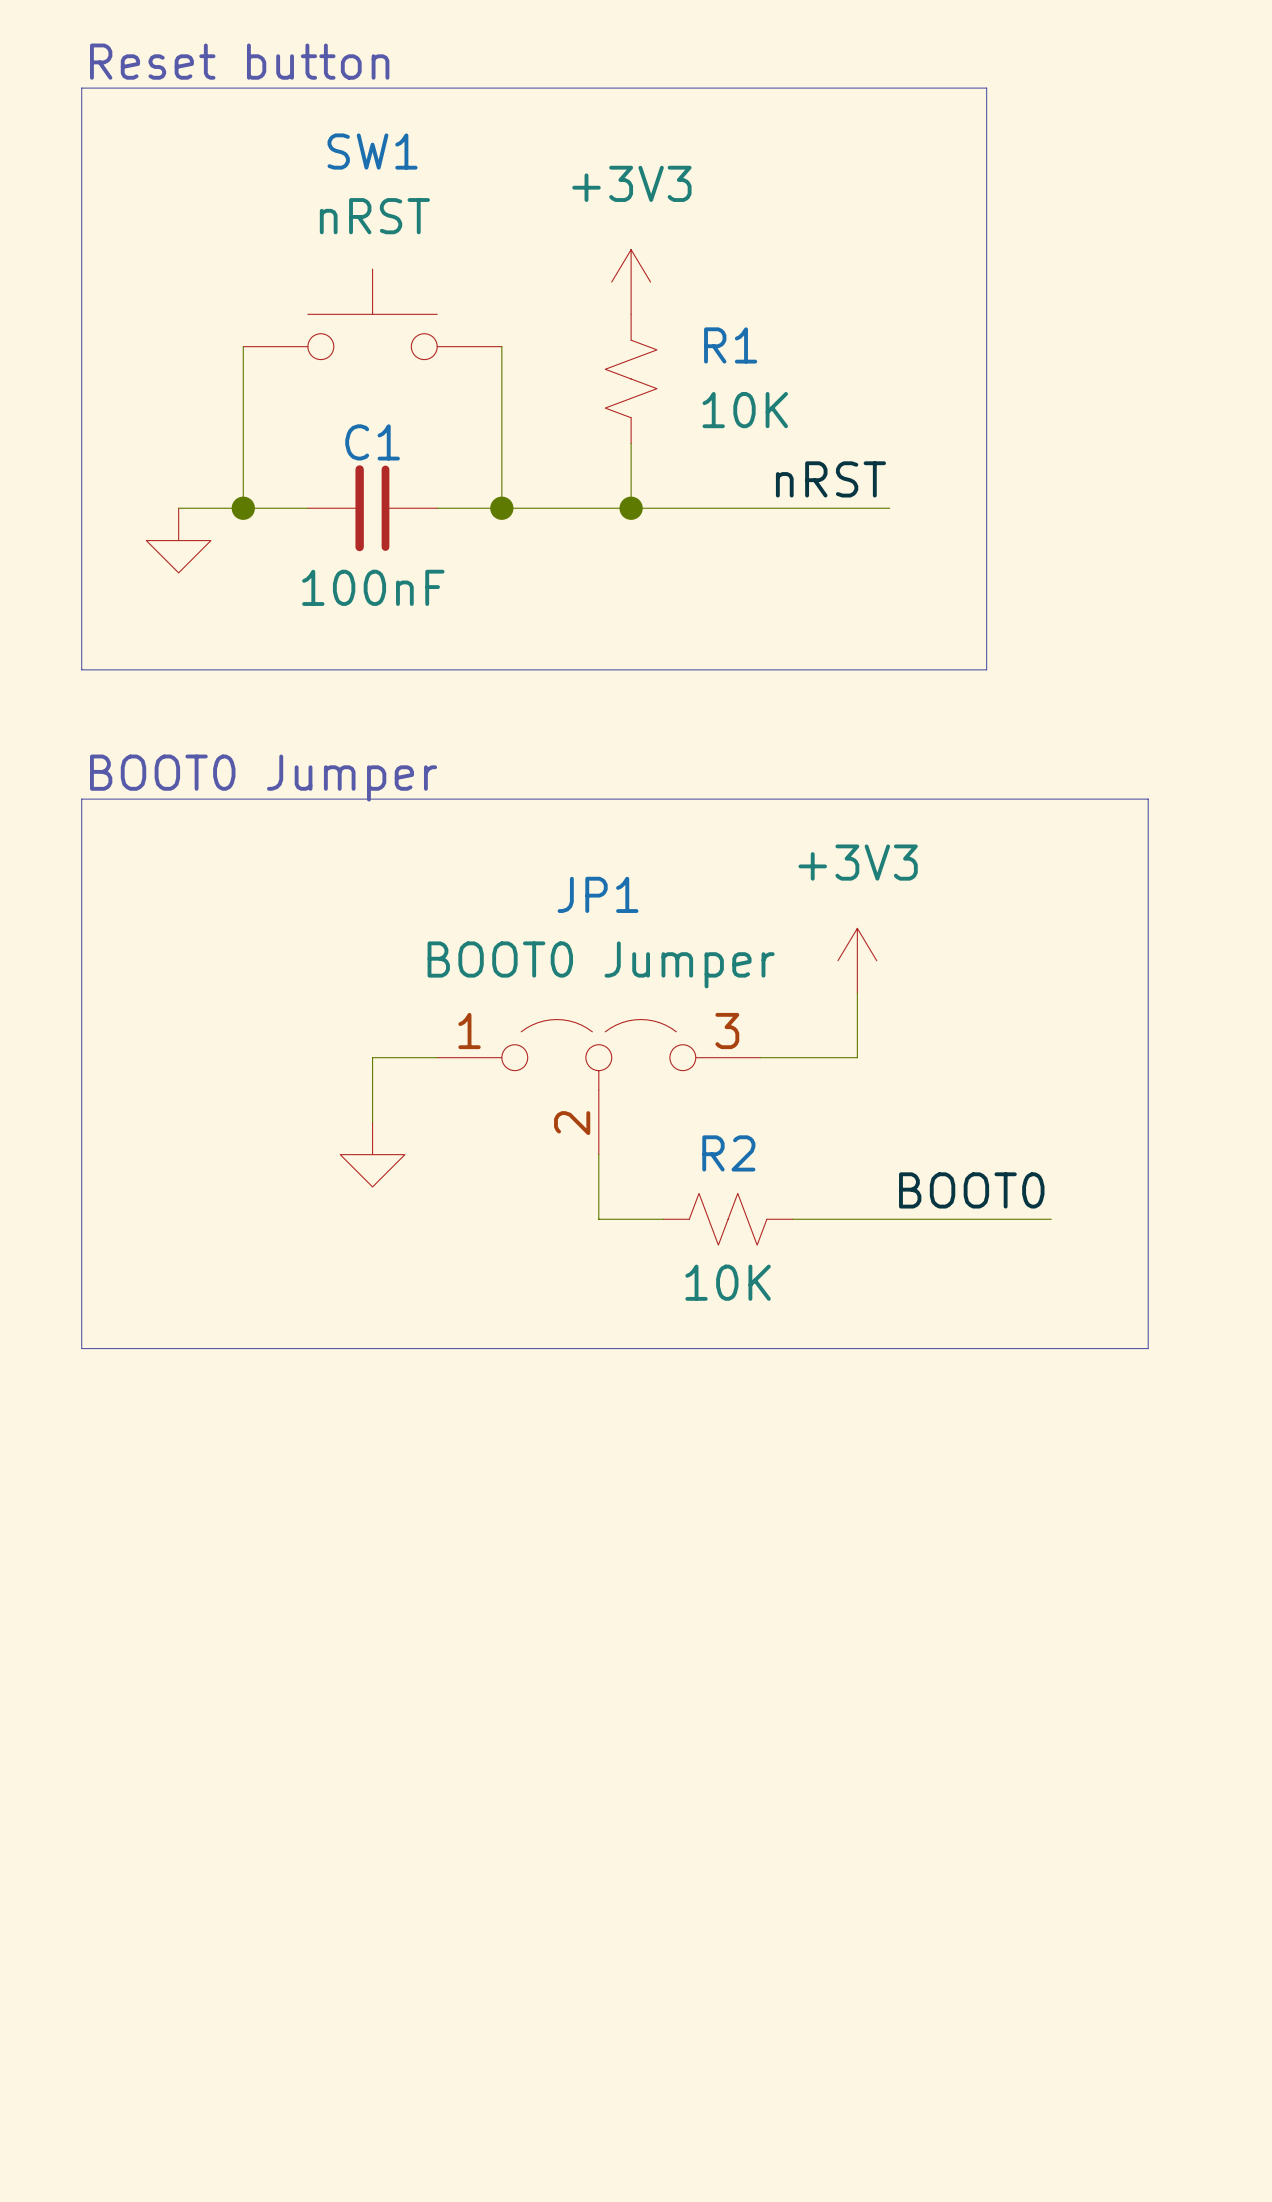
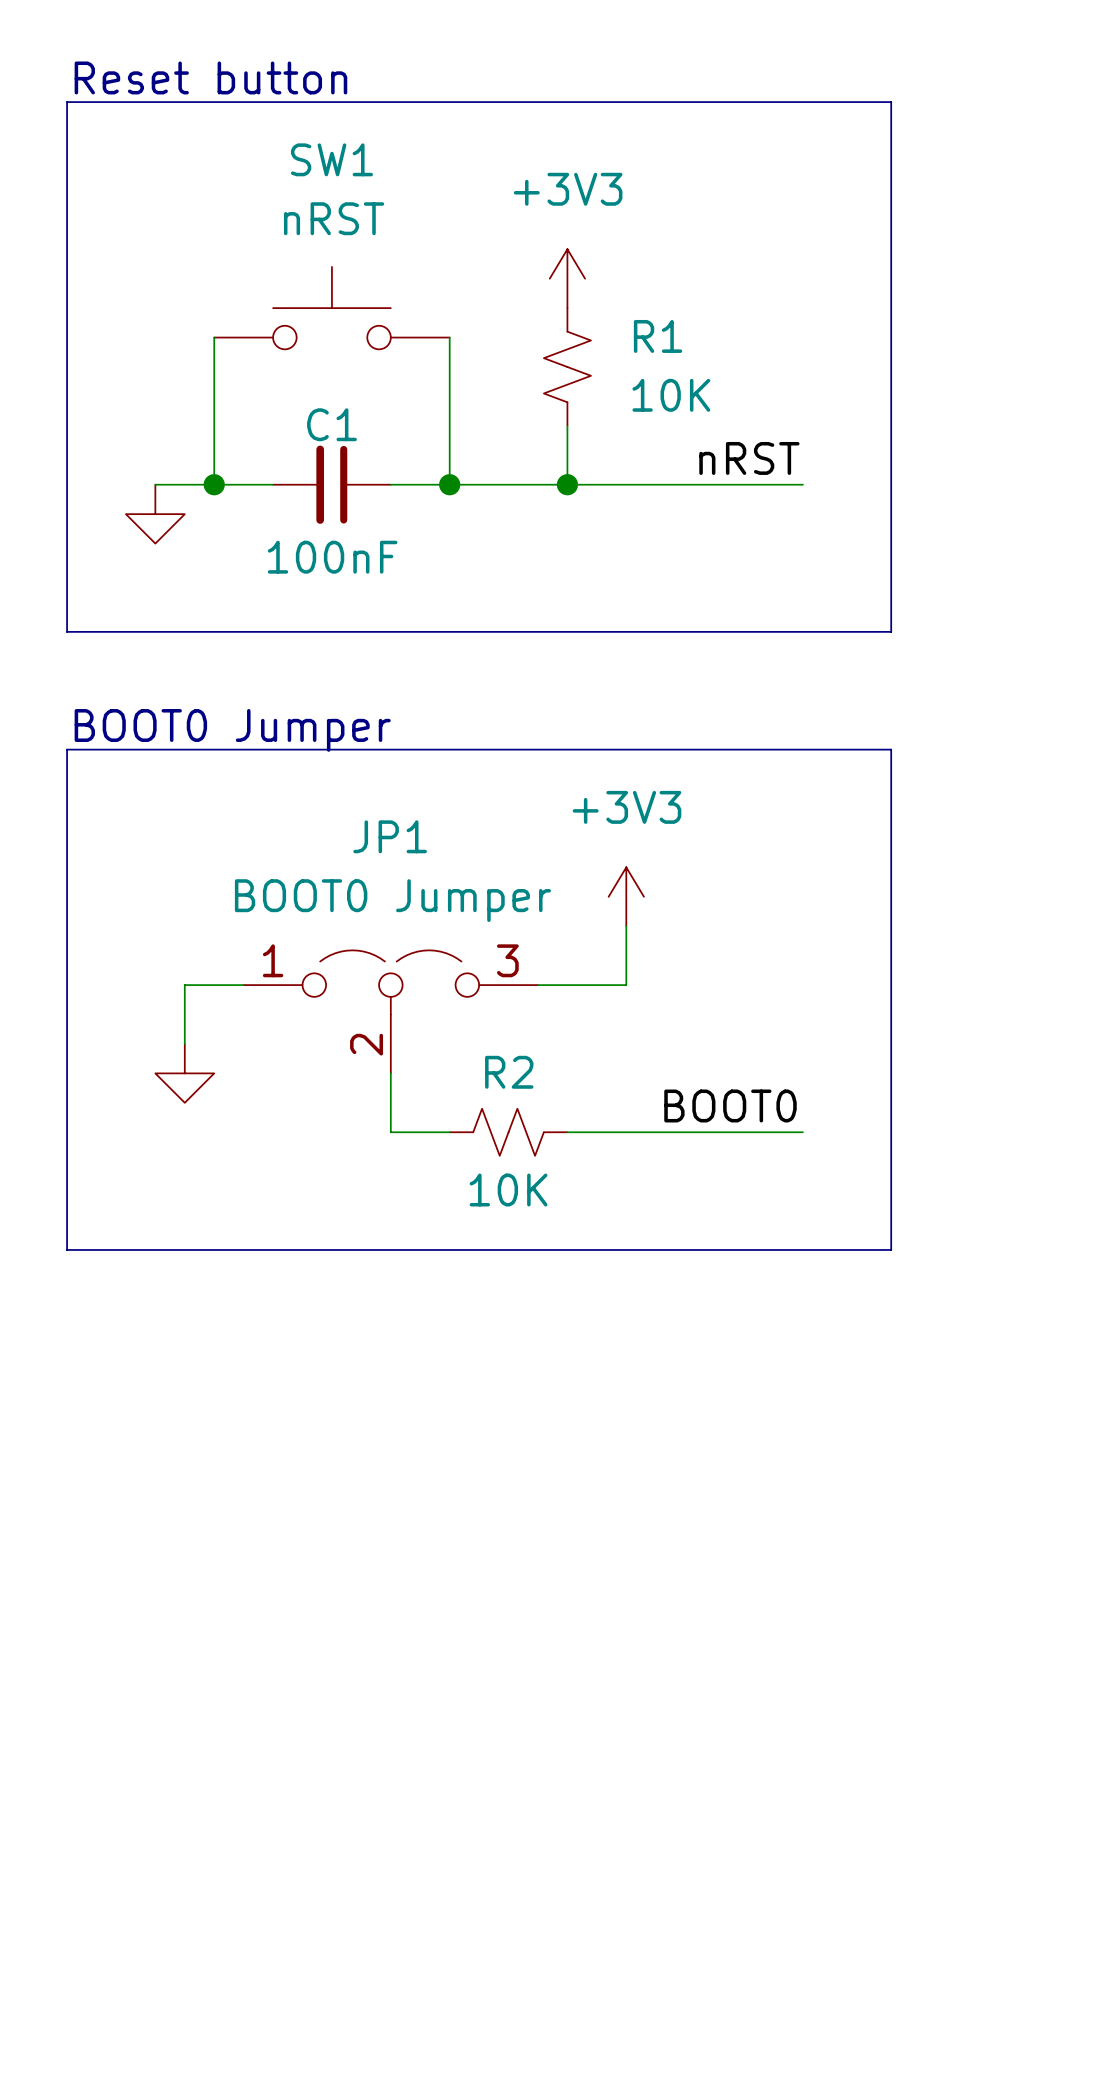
line: (986, 799) (1148, 799) (1148, 1348) (986, 1348) -> (891, 749) (891, 1249)
power symbol position: +3V3 (857, 960) -> +3V3 (626, 896)
wire: (857, 993) (857, 1057) (760, 1057) -> (626, 926) (626, 985) (537, 985)
wire: (437, 1057) (372, 1057) (372, 1122) -> (243, 985) (184, 985) (184, 1043)
JP1 position: (598, 1087) -> (390, 1011)
power symbol position: (372, 1154) -> (184, 1073)
wire: none -> (390, 1073) (390, 1132) (449, 1132)
wire: (598, 1154) (598, 1219) (631, 1219) -> none
label position: BOOT0 (971, 1190) -> BOOT0 (730, 1105)
wire: none -> (596, 1132) (714, 1132)
R2 position: (728, 1219) -> (508, 1132)
wire: (889, 1219) (1051, 1219) -> none

